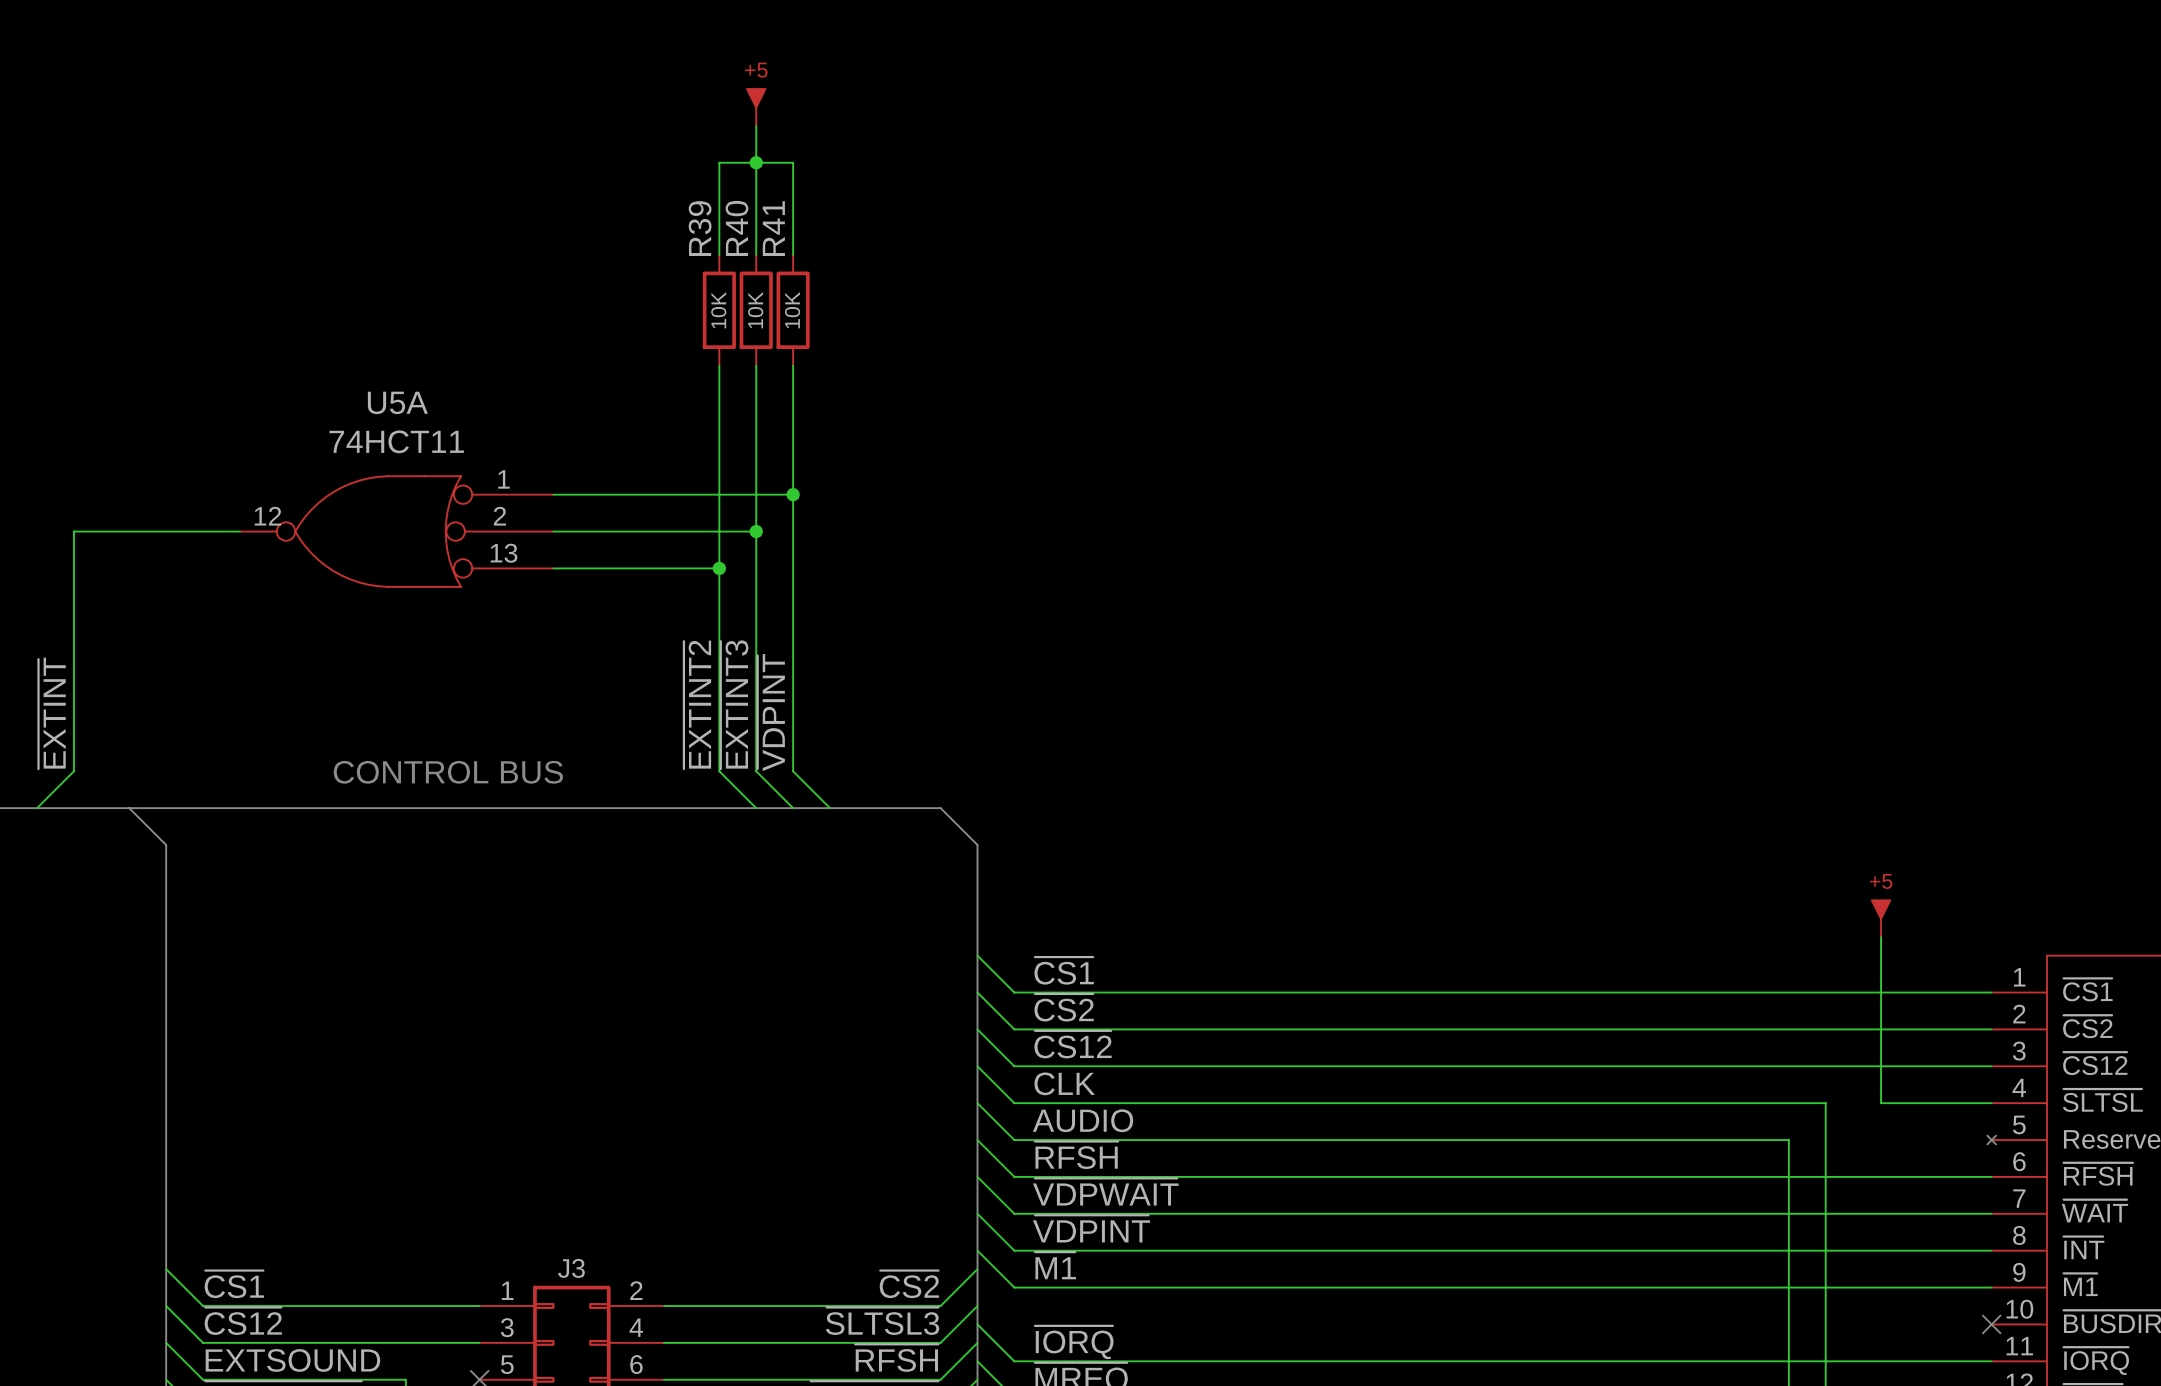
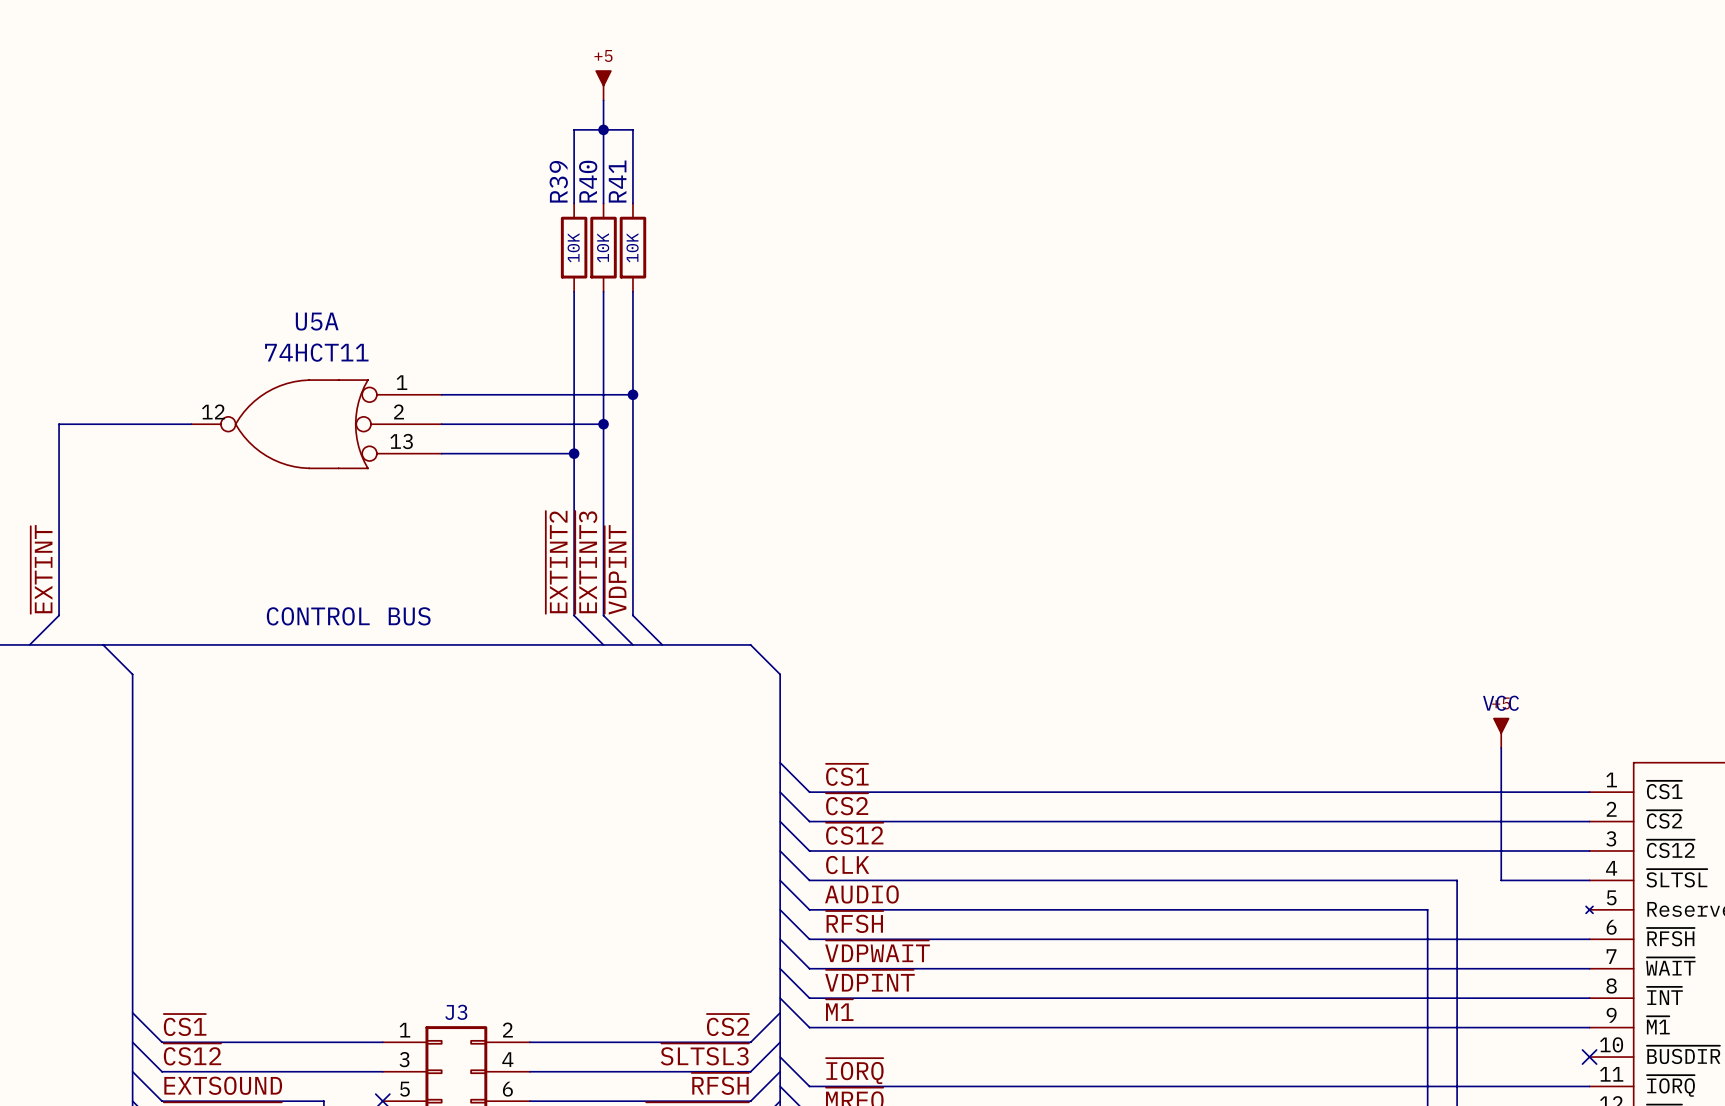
power symbol text: none -> VCC (1500, 703)

